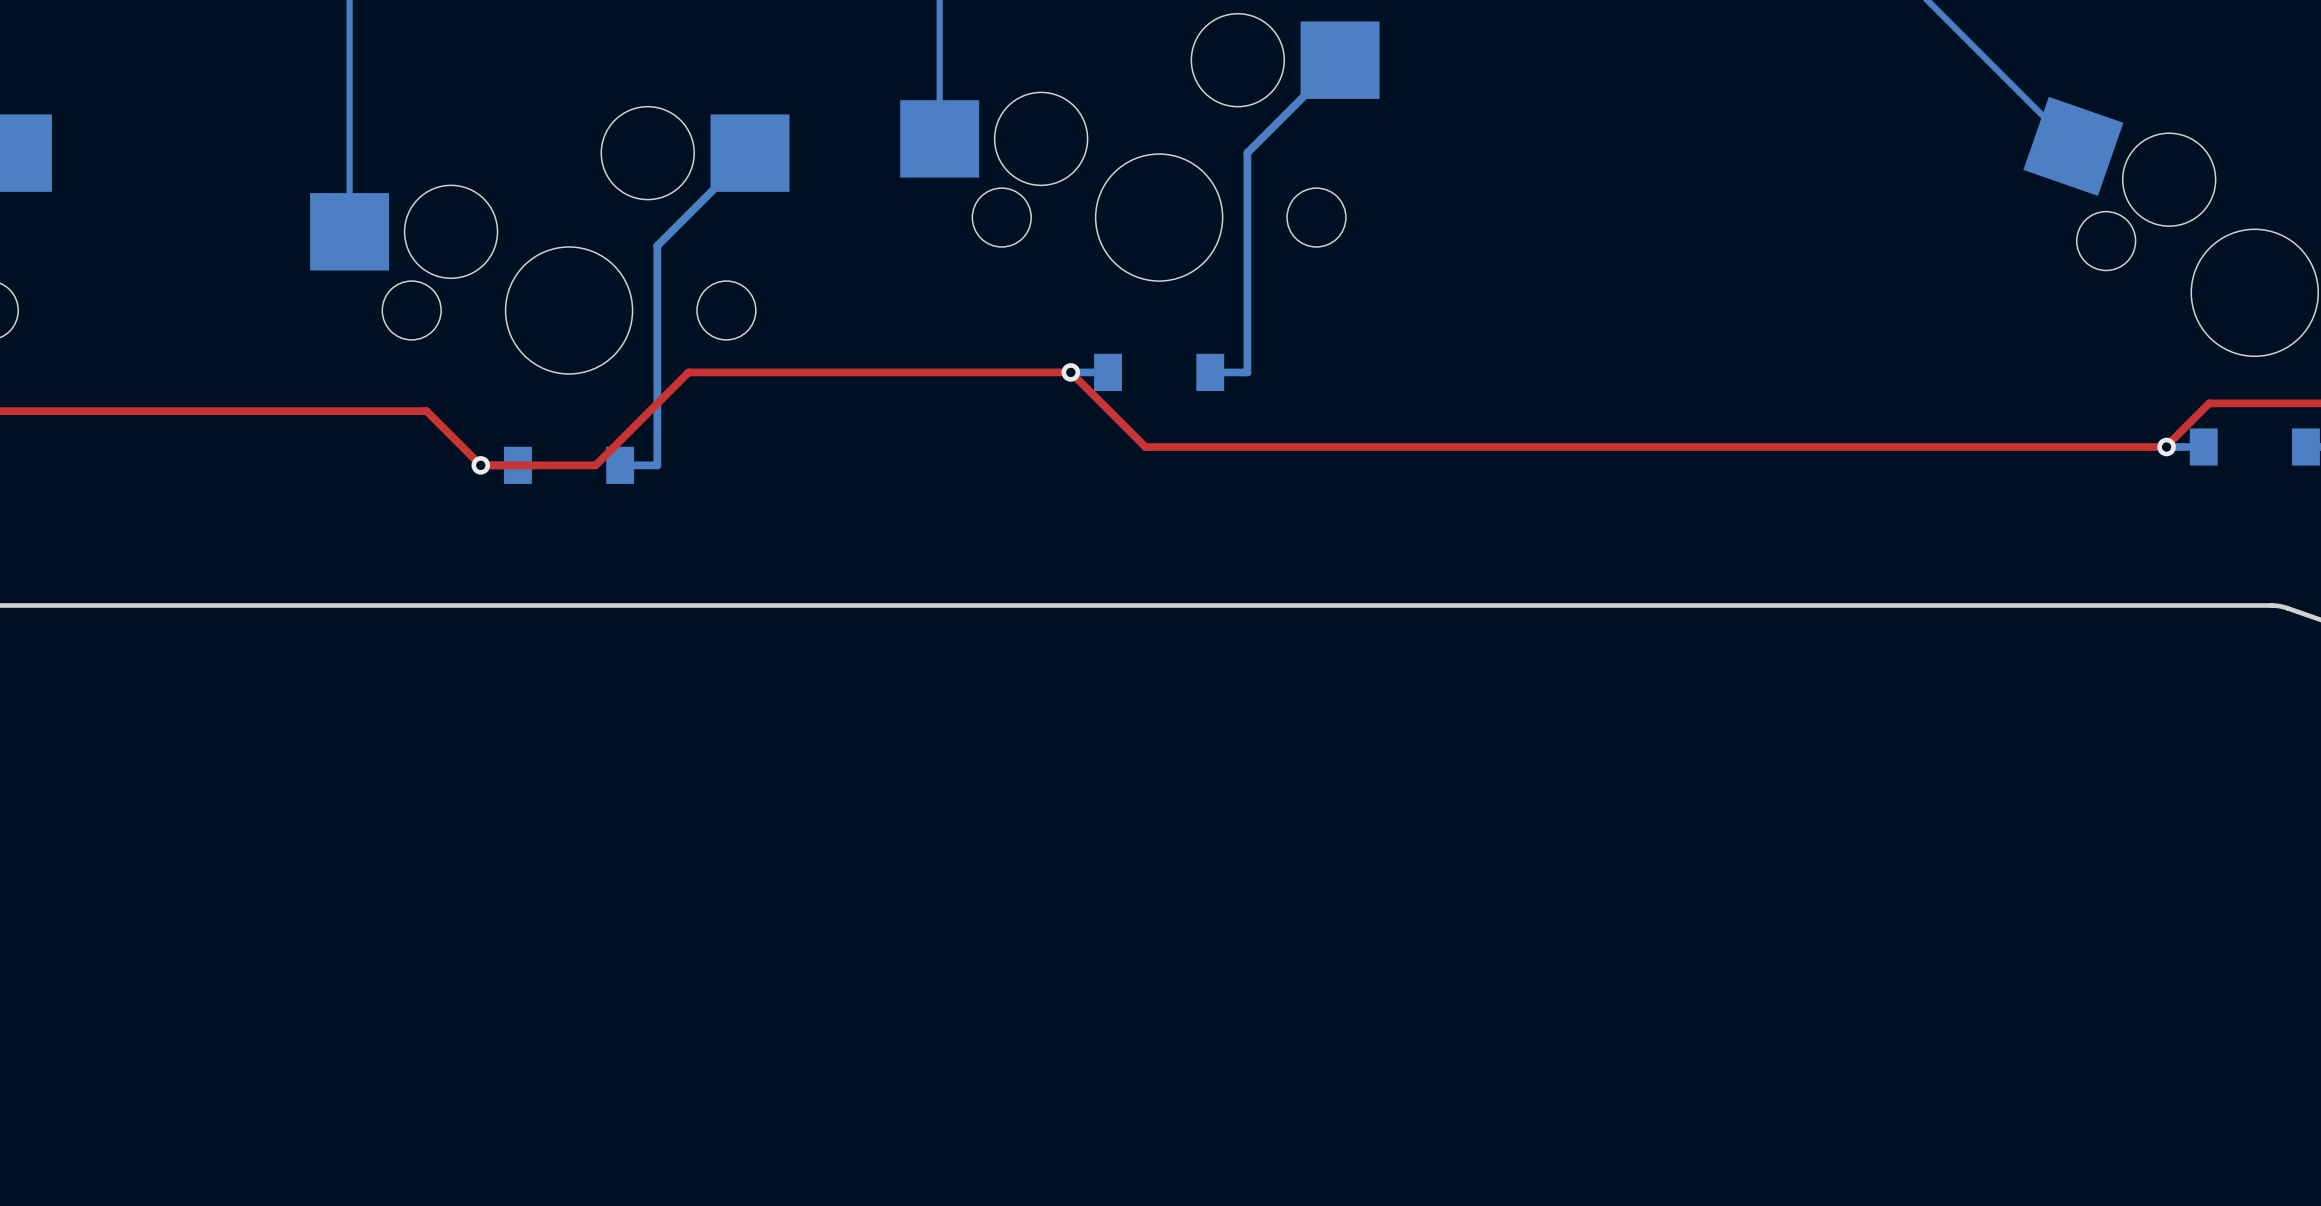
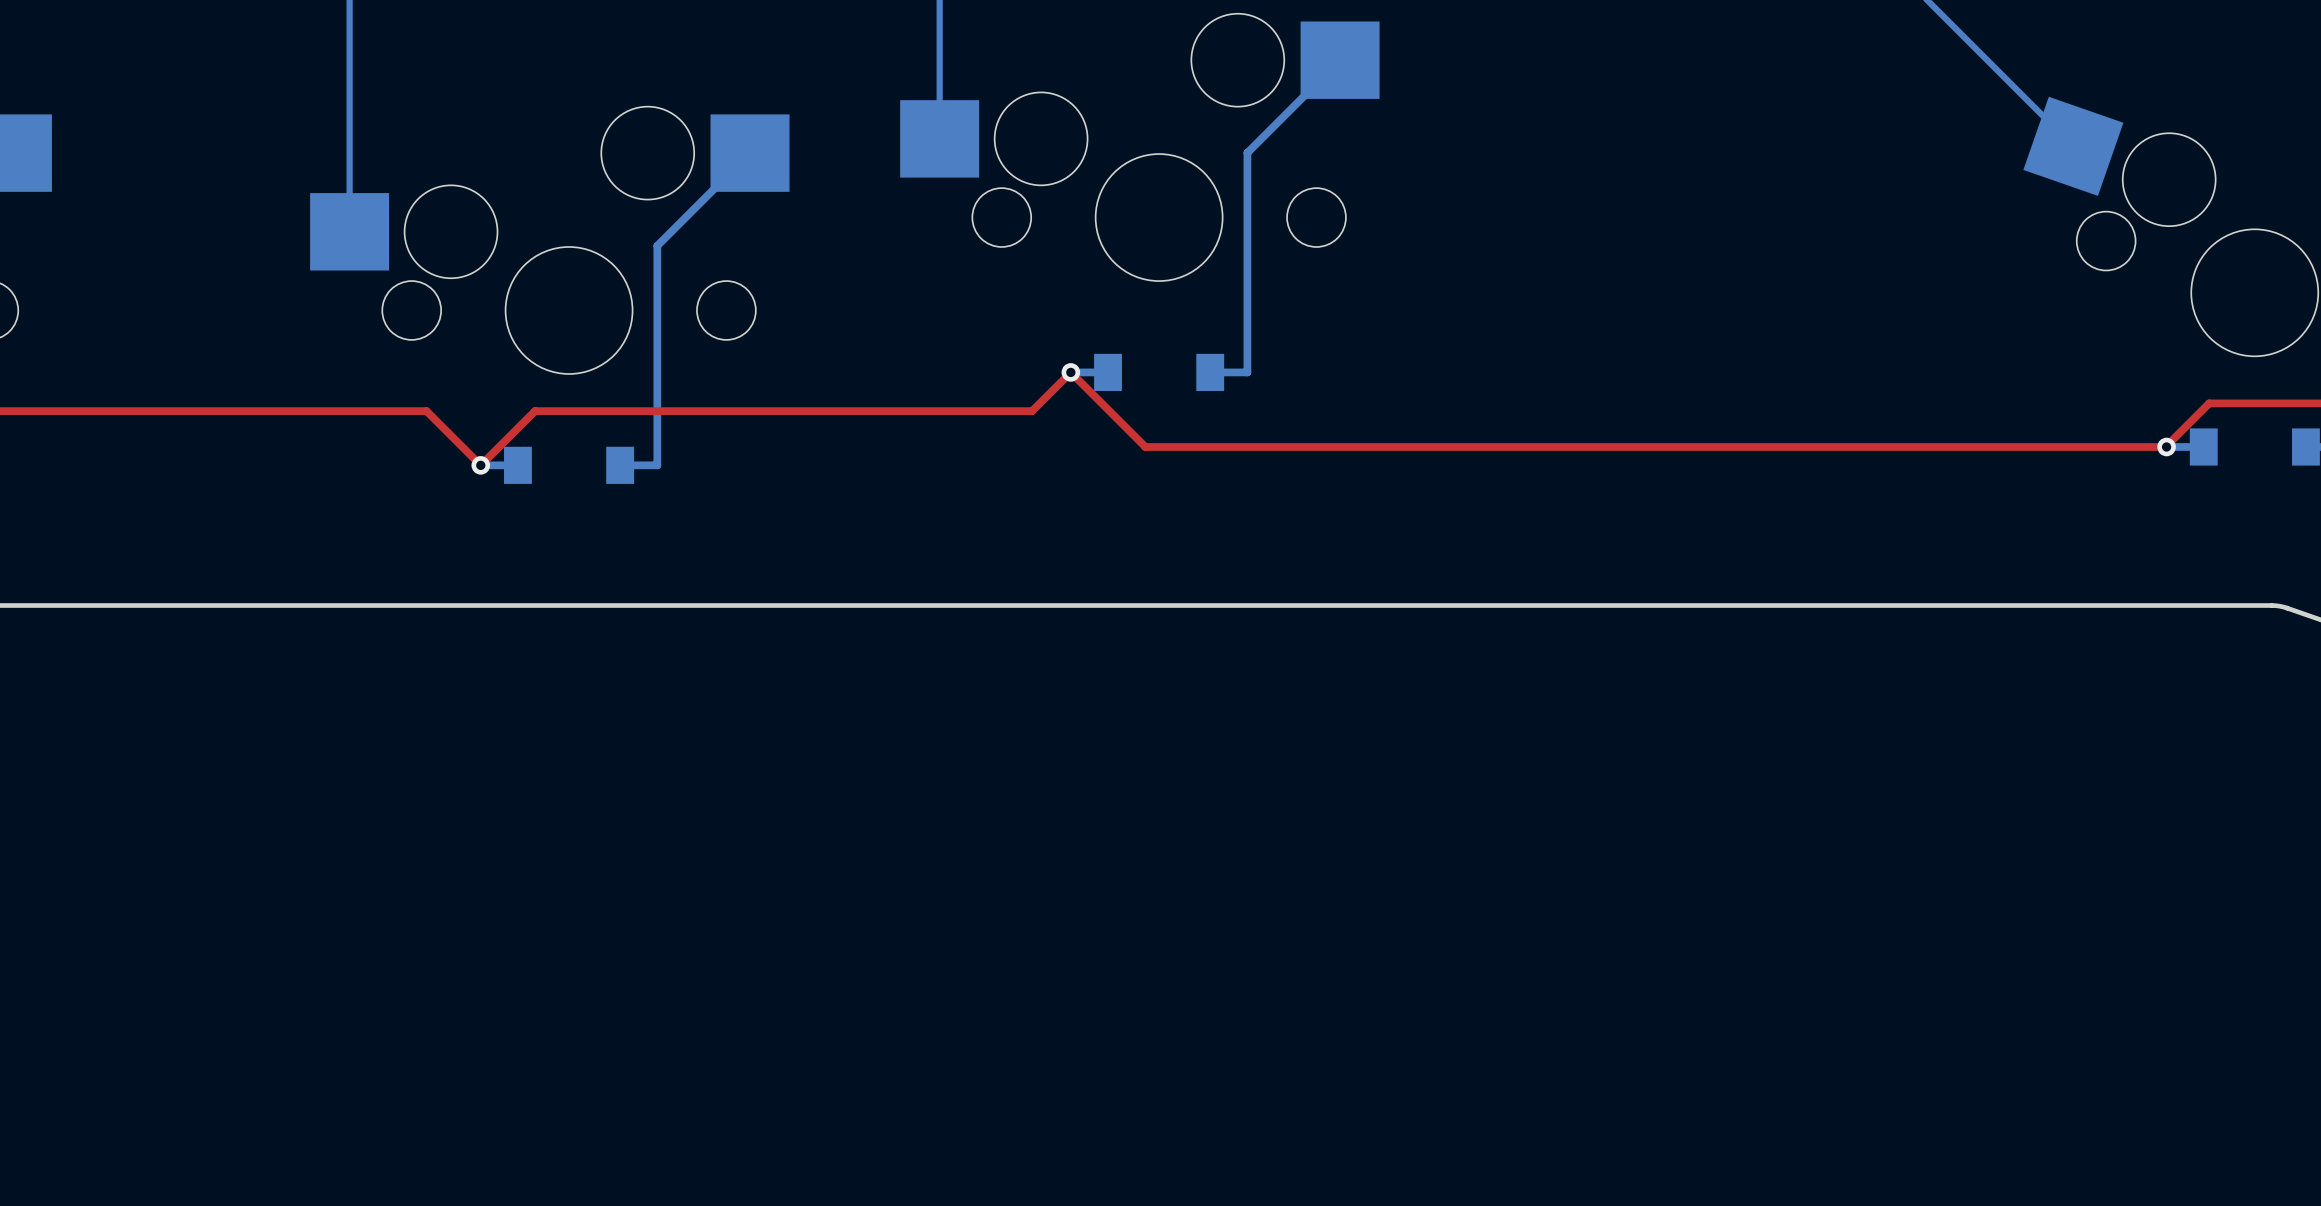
top track: (1070, 372) (688, 372) (595, 465) (480, 465) -> (1070, 372) (1032, 411) (534, 411) (480, 465)

